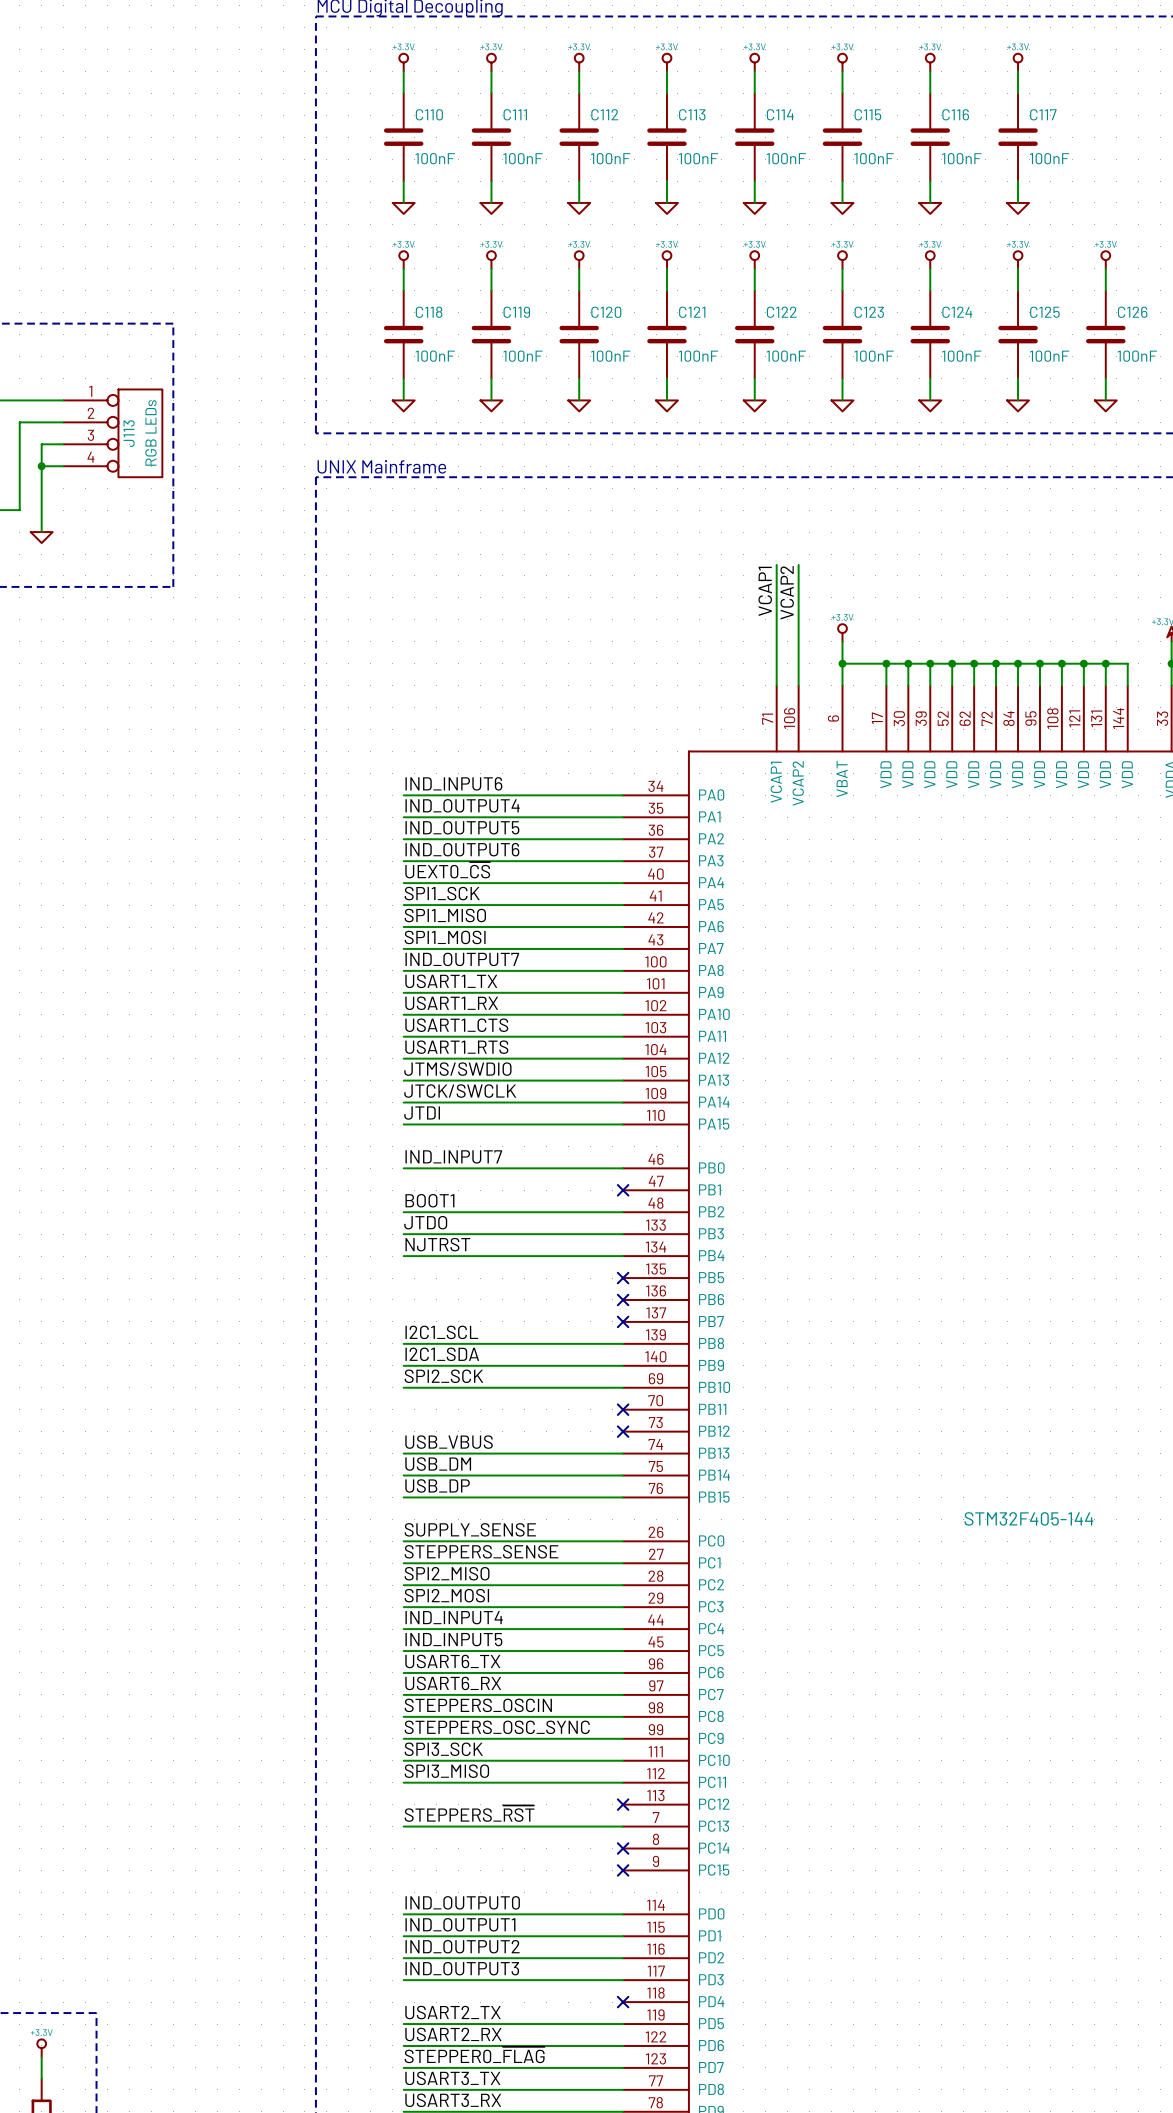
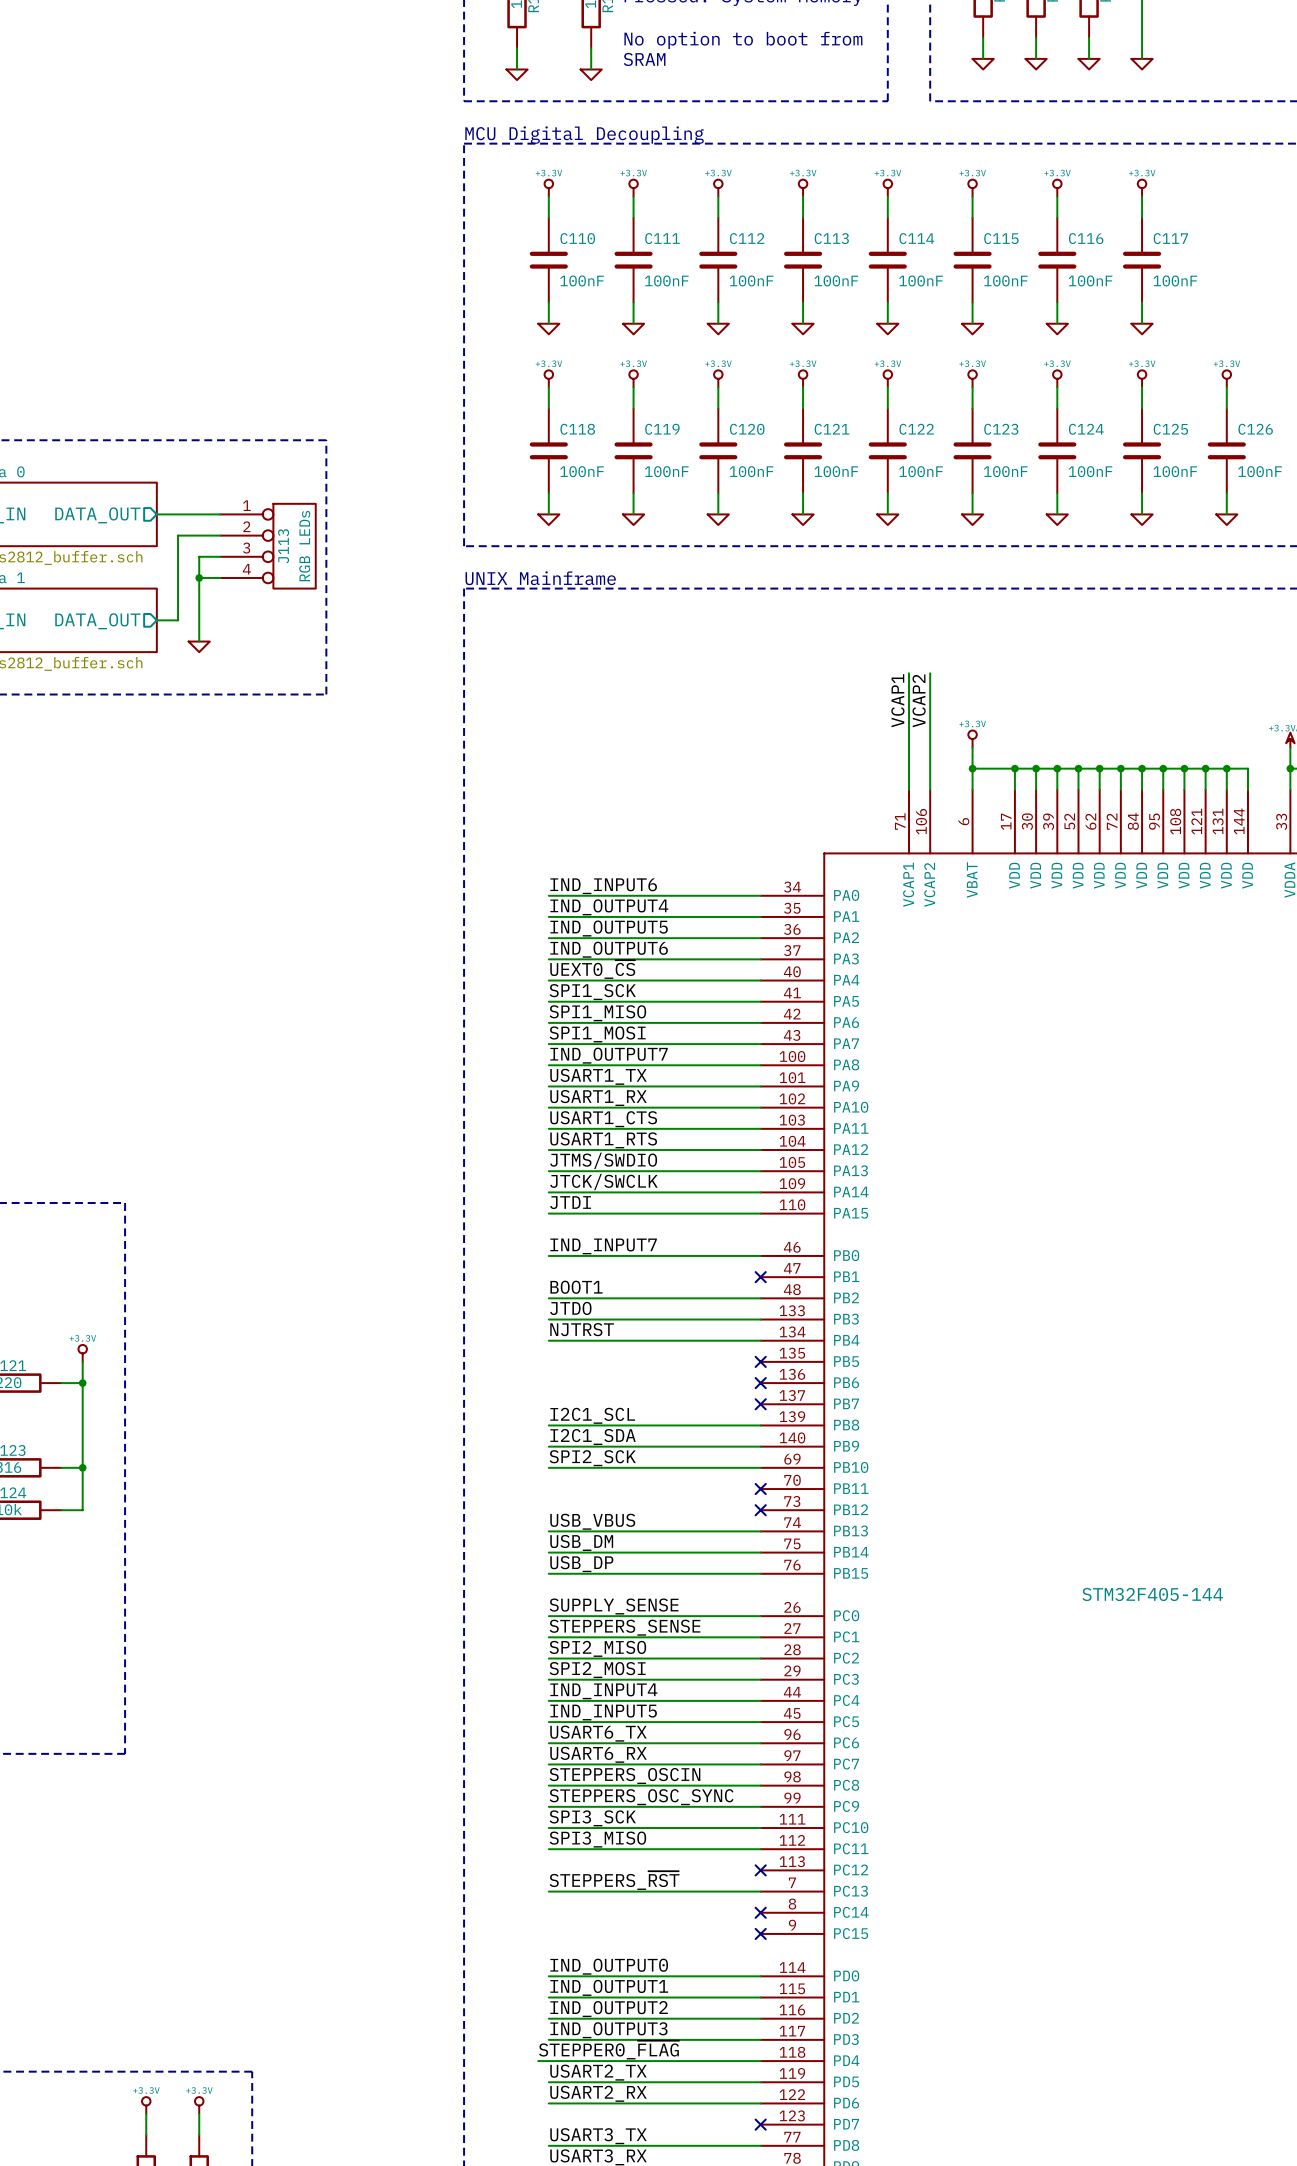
wire: none -> (538, 2061) (760, 2061)
no-connect mark: (623, 2002) -> none
label position: STEPPER0_~{FLAG} (474, 2055) -> STEPPER0_~{FLAG} (609, 2050)
wire: (403, 2067) (623, 2067) -> none
no-connect mark: none -> (760, 2124)

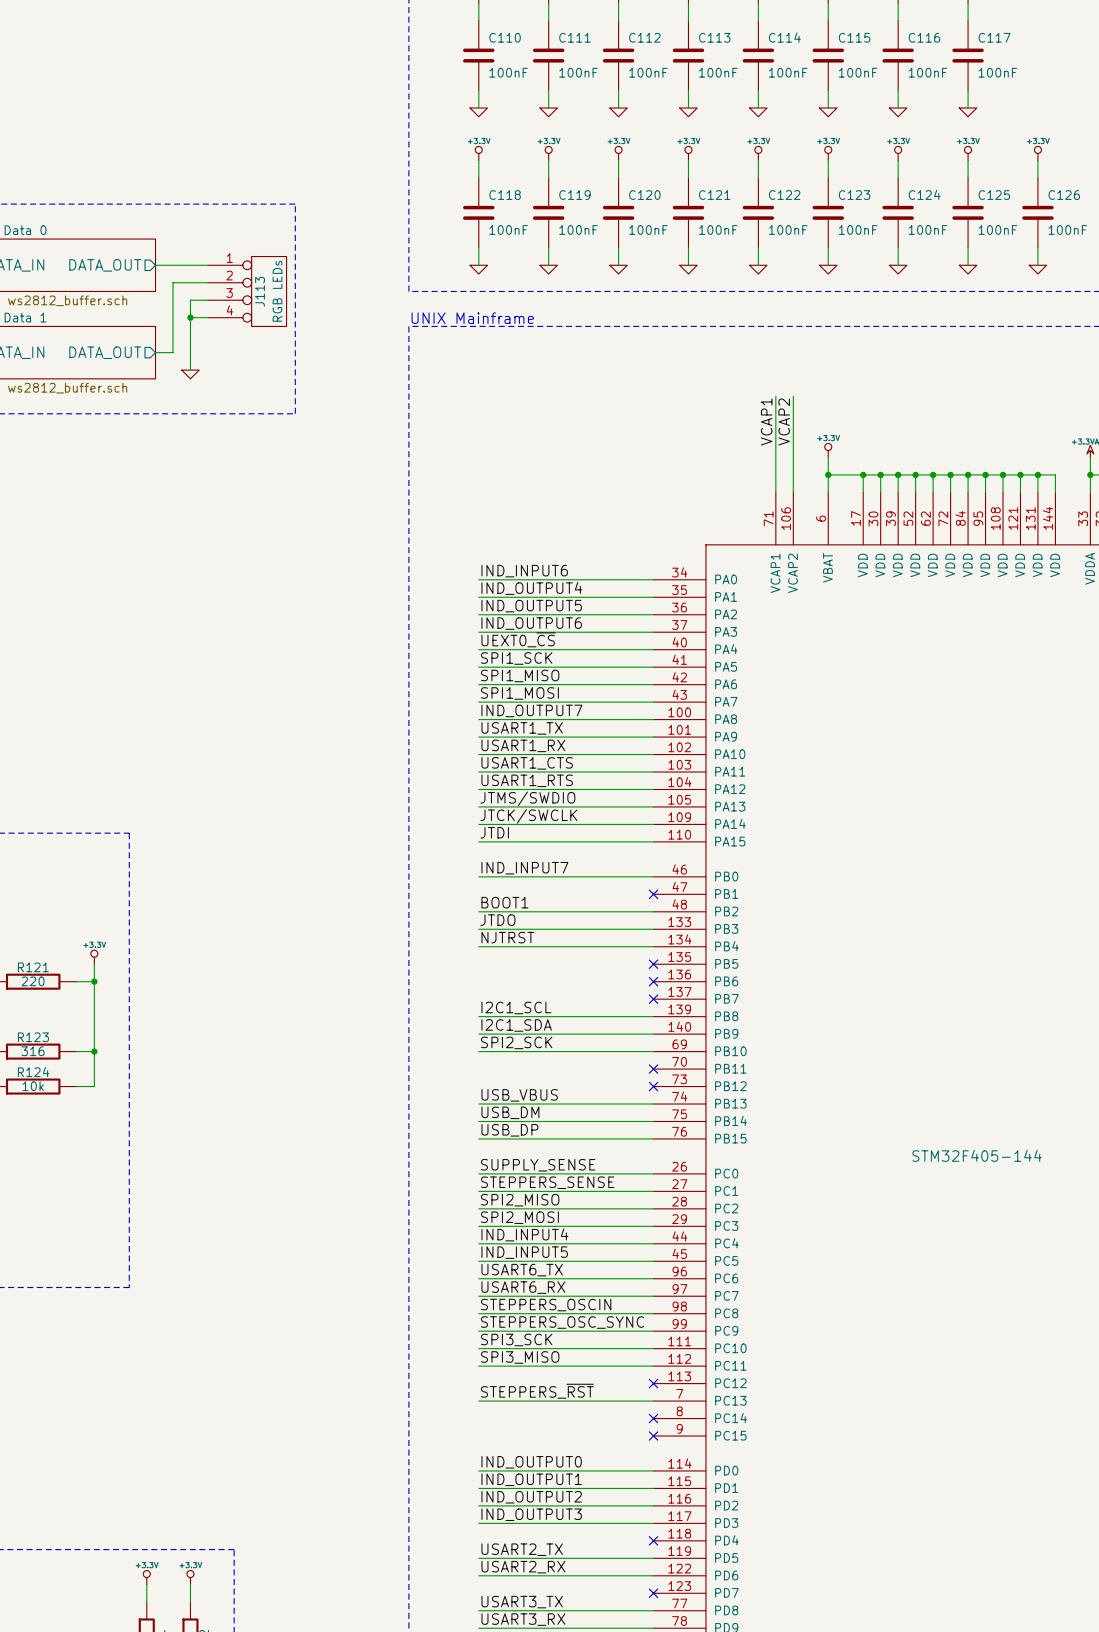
label: STEPPER0_~{FLAG} (609, 2050) -> none
wire: (538, 2061) (760, 2061) -> none
no-connect mark: none -> (653, 1540)

